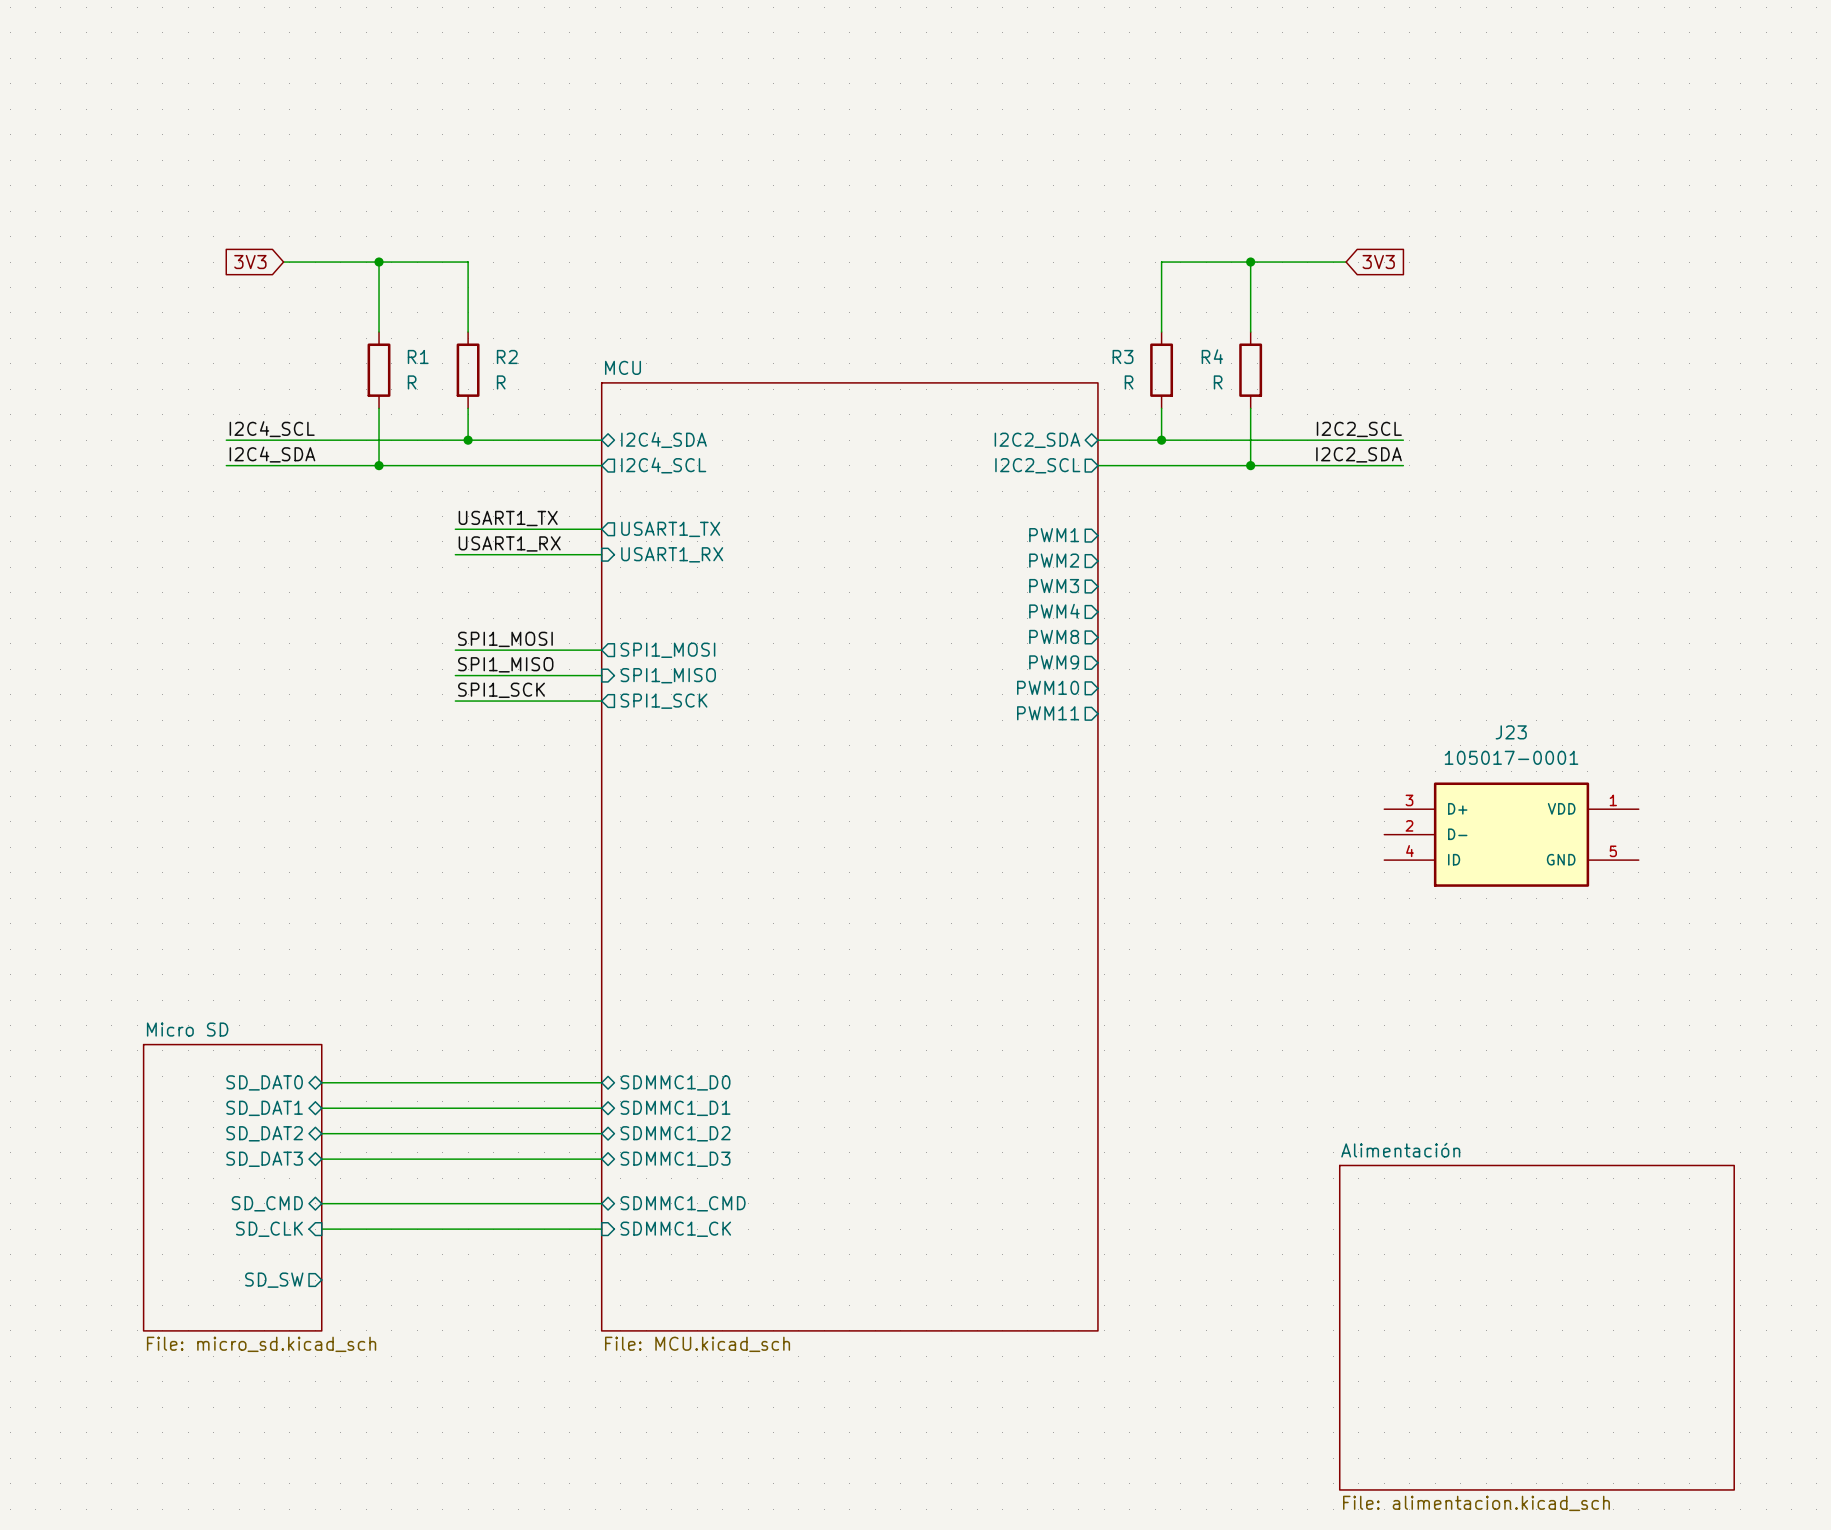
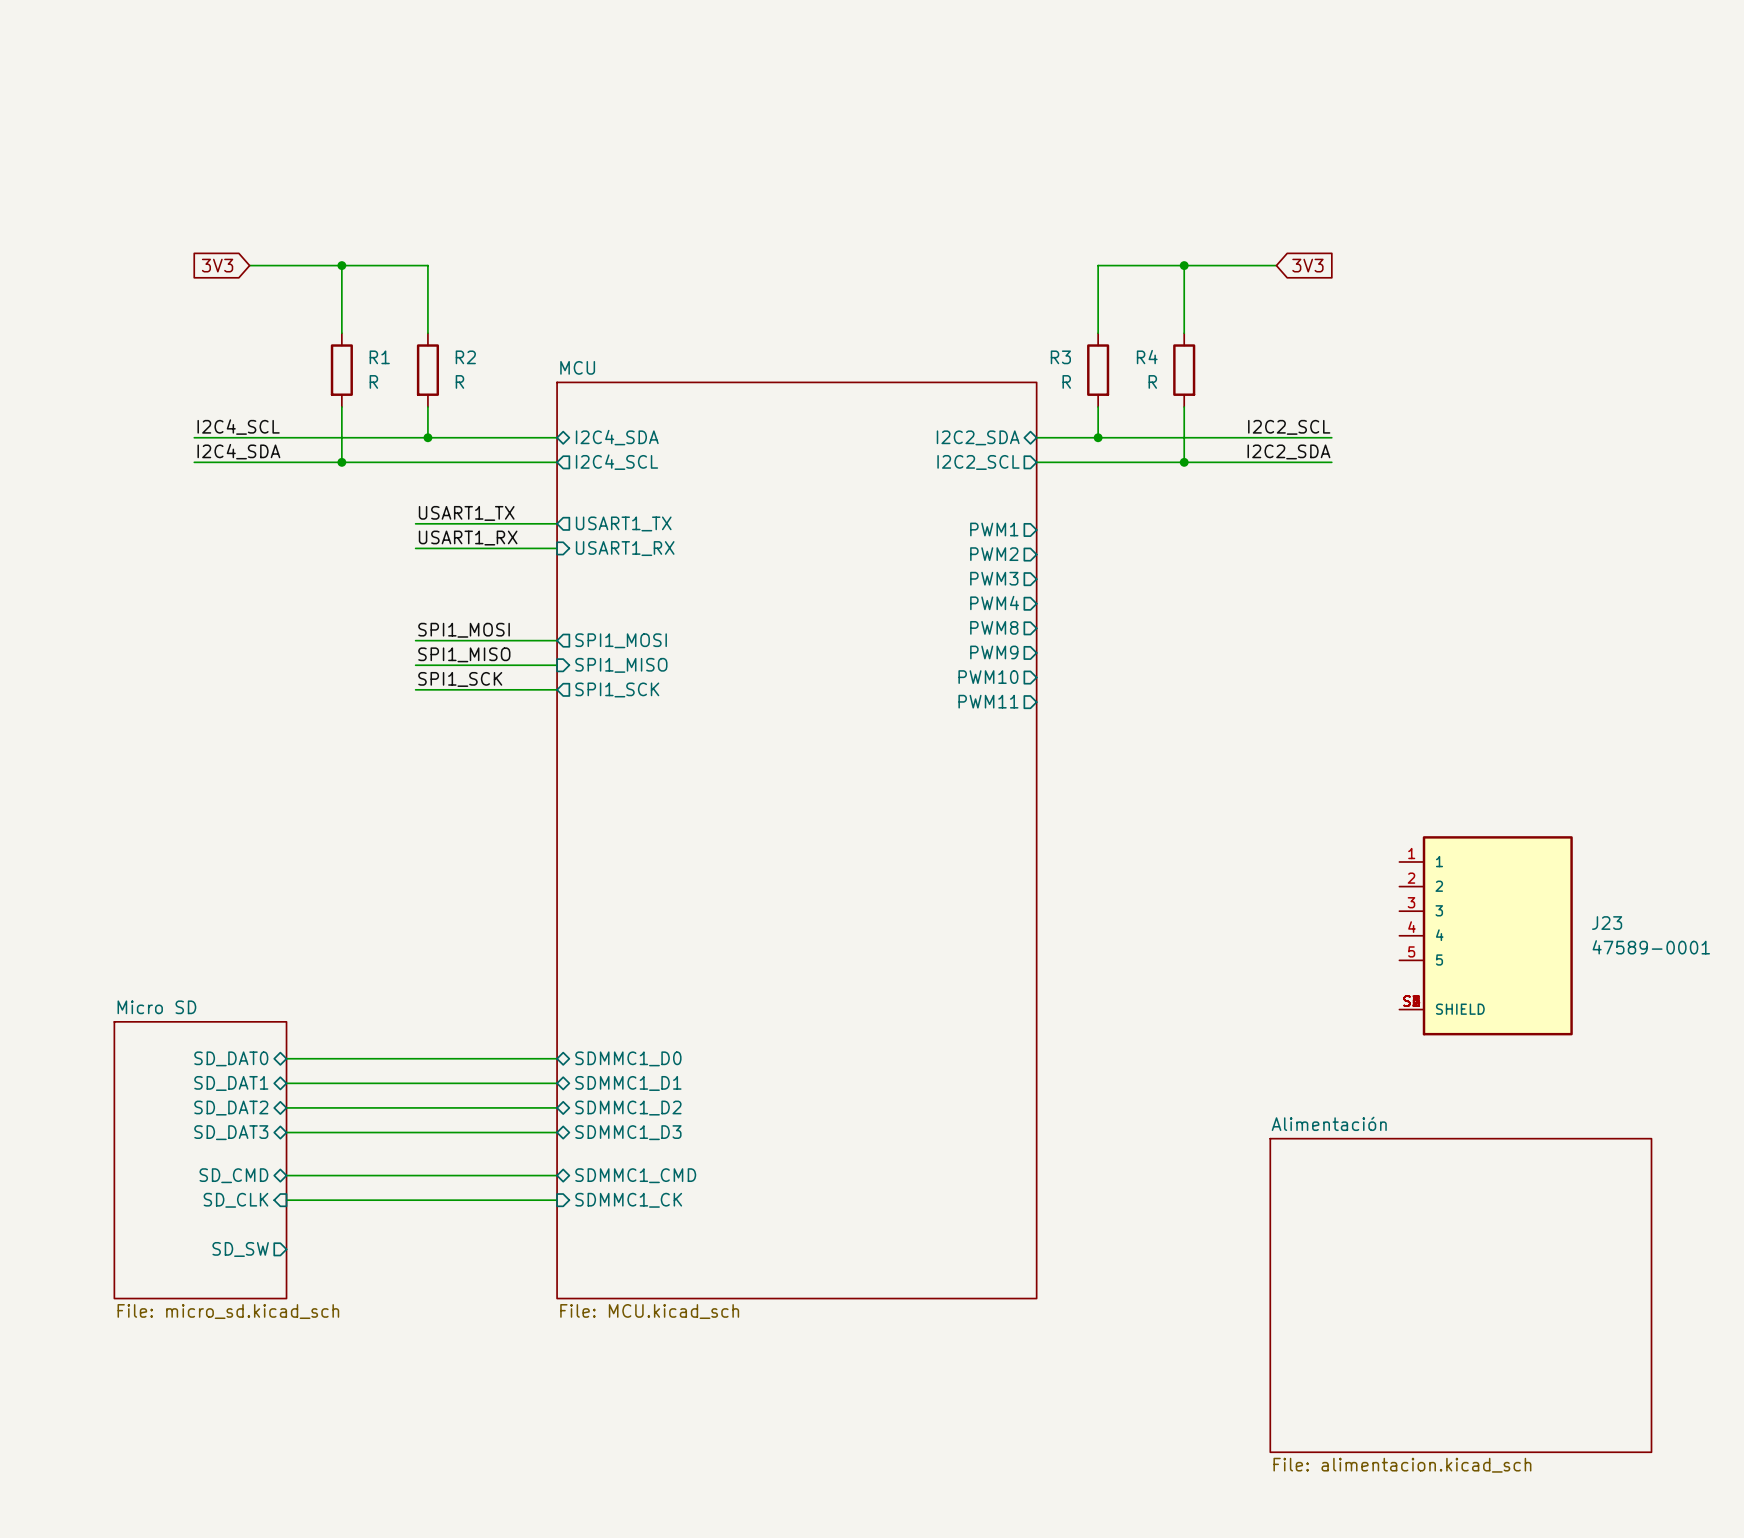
J23 name position: J23 (1511, 732) -> J23 (1607, 923)
J23 value: 105017-0001 (1511, 757) -> 47589-0001 (1651, 947)
J23 symbol: [1384, 782, 1639, 887] -> [1399, 836, 1573, 1036]

